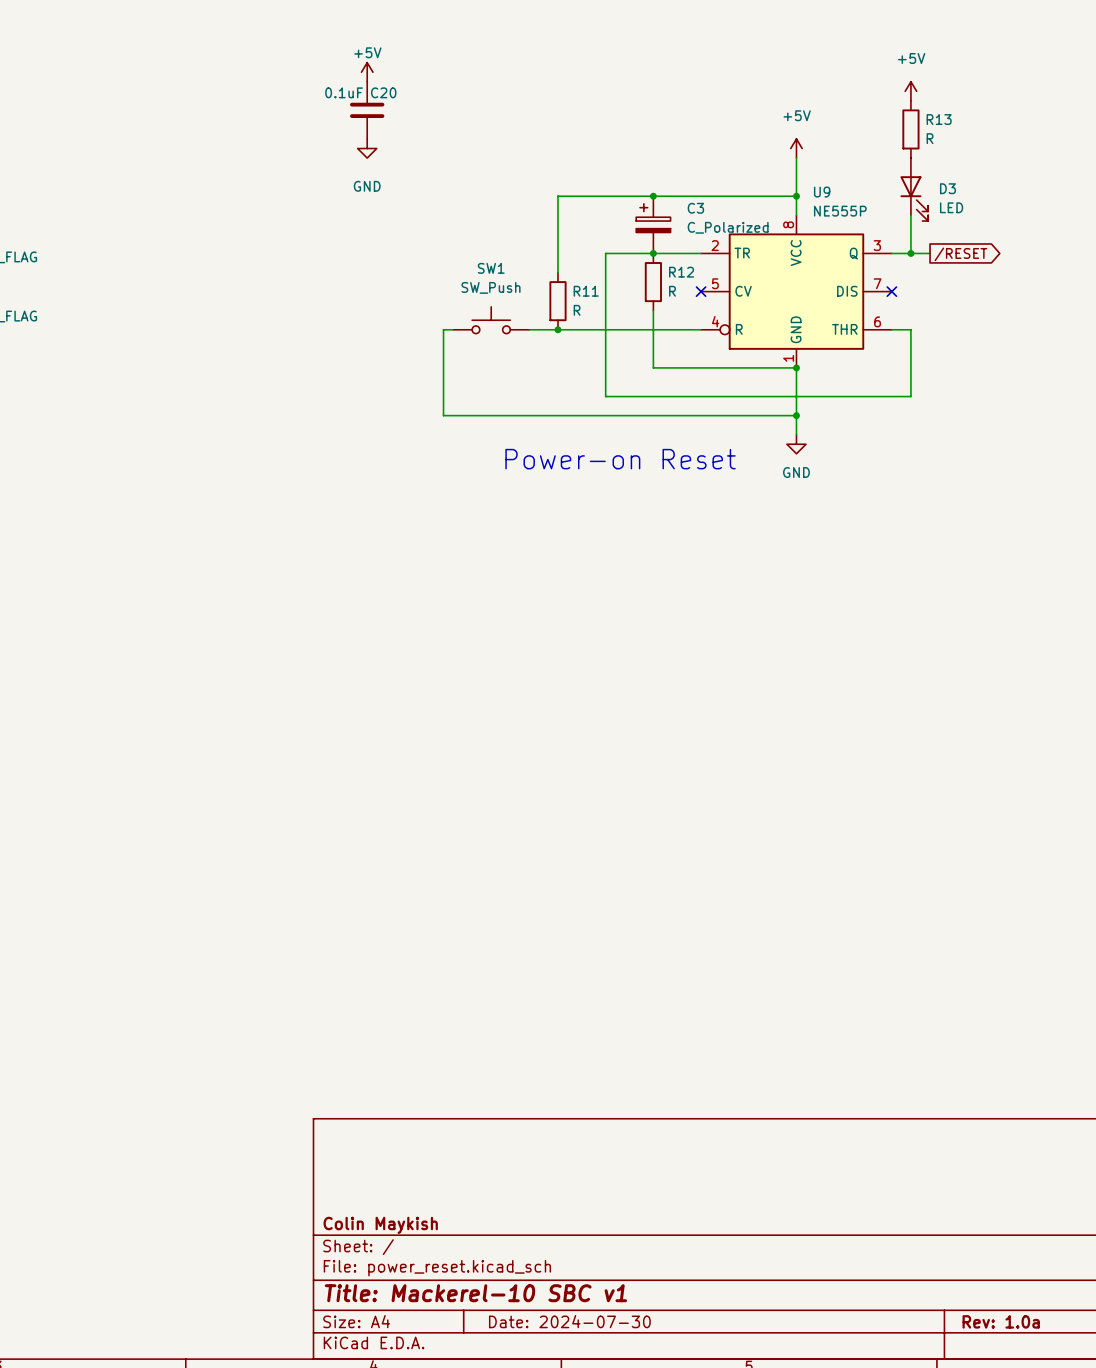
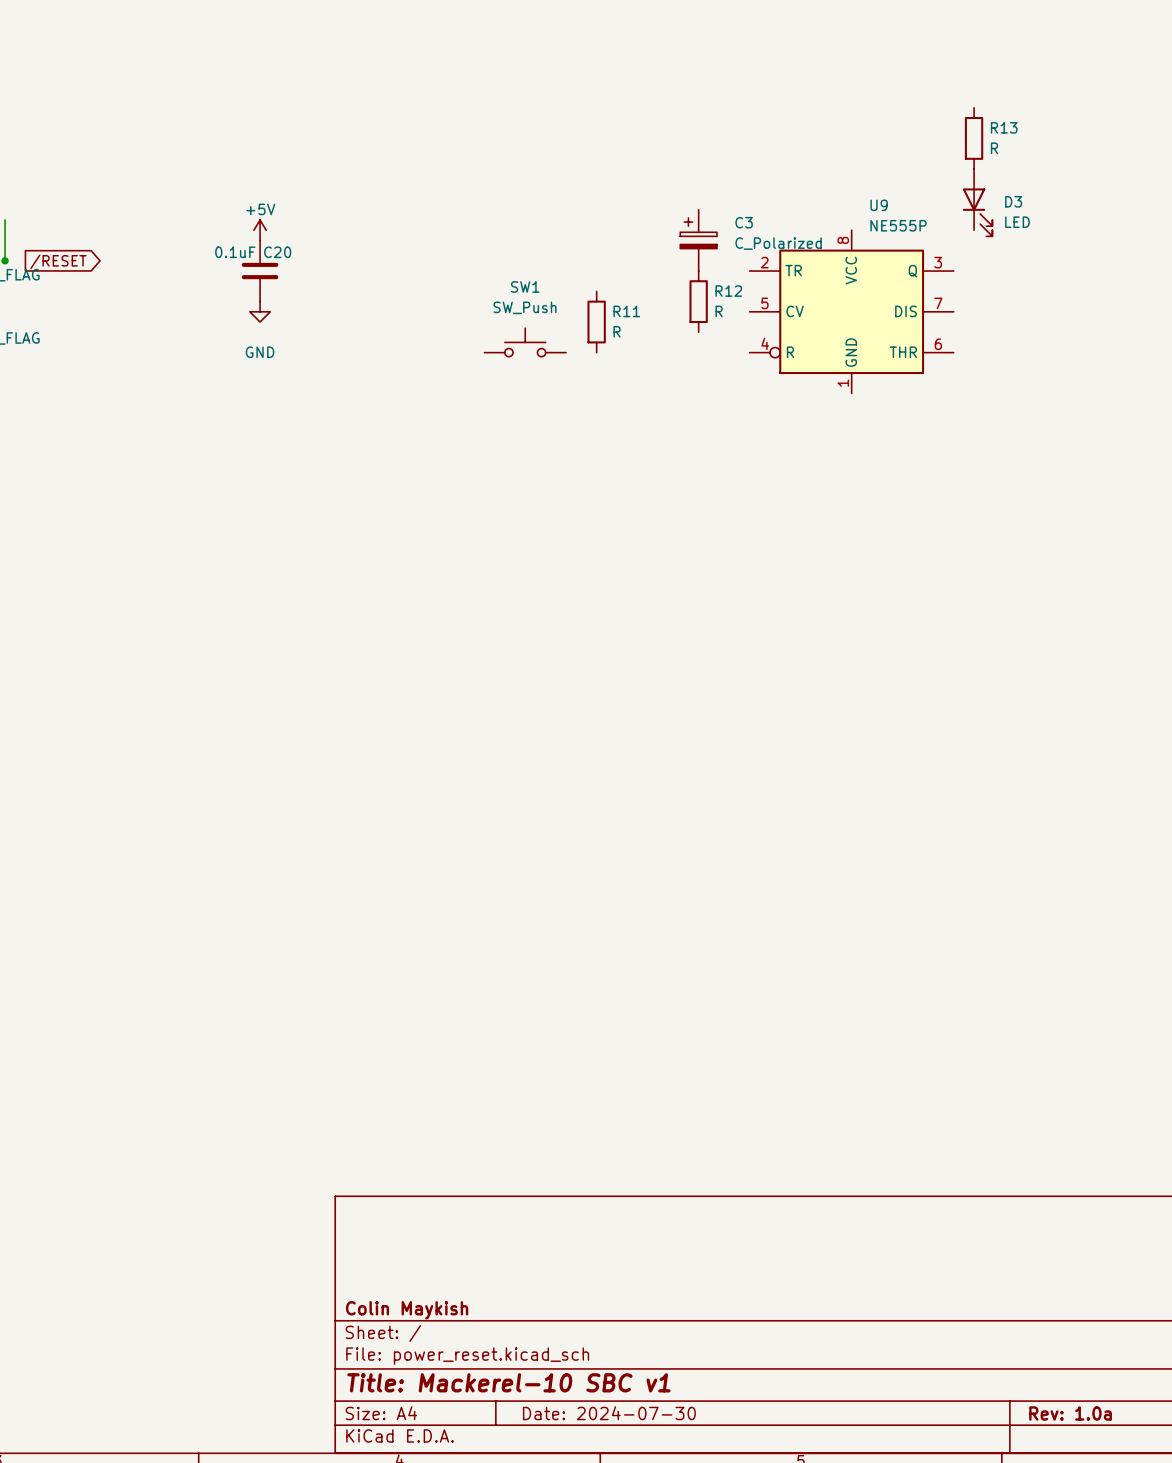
power symbol: +5V (367, 72) -> none
power symbol: +5V (910, 91) -> none
C20 position: (367, 110) -> (260, 271)
power symbol: GND (367, 148) -> none
power symbol: +5V (796, 148) -> none
wire: (796, 158) (796, 215) -> none
junction: (653, 196) -> none
wire: (796, 196) (557, 196) (557, 272) -> none
junction: (796, 196) -> none
wire: none -> (5, 220) (5, 260)
power symbol: none -> +5V (260, 230)
wire: (910, 215) (910, 253) -> none
junction: none -> (5, 260)
global label: none -> /RESET (58, 261)
junction: (653, 253) -> none
wire: (701, 253) (605, 253) (605, 396) (910, 396) (910, 329) (891, 329) -> none
wire: (891, 253) (930, 253) -> none
junction: (910, 253) -> none
global label: /RESET (960, 254) -> none
power symbol: none -> GND (260, 311)
no-connect mark: (701, 291) -> none
no-connect mark: (891, 291) -> none
wire: (653, 310) (653, 367) (796, 367) (796, 434) -> none
wire: (453, 329) (443, 329) (443, 415) (796, 415) -> none
wire: (529, 329) (701, 329) -> none
junction: (557, 329) -> none
junction: (796, 367) -> none
junction: (796, 415) -> none
power symbol: GND (796, 444) -> none
text: Power-on Reset (620, 459) -> none

